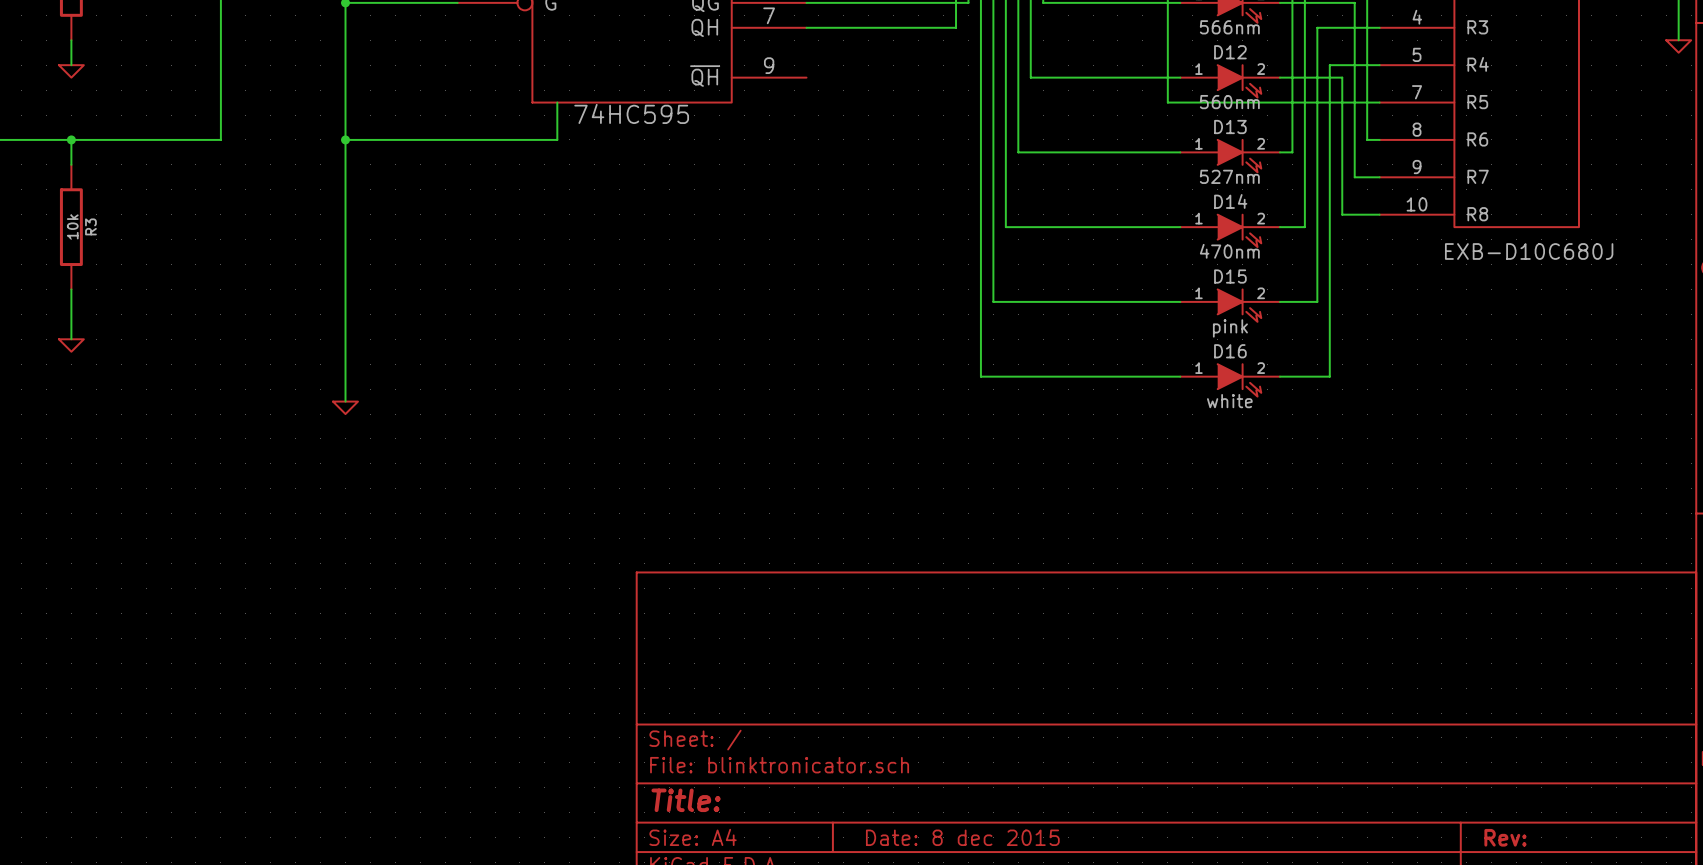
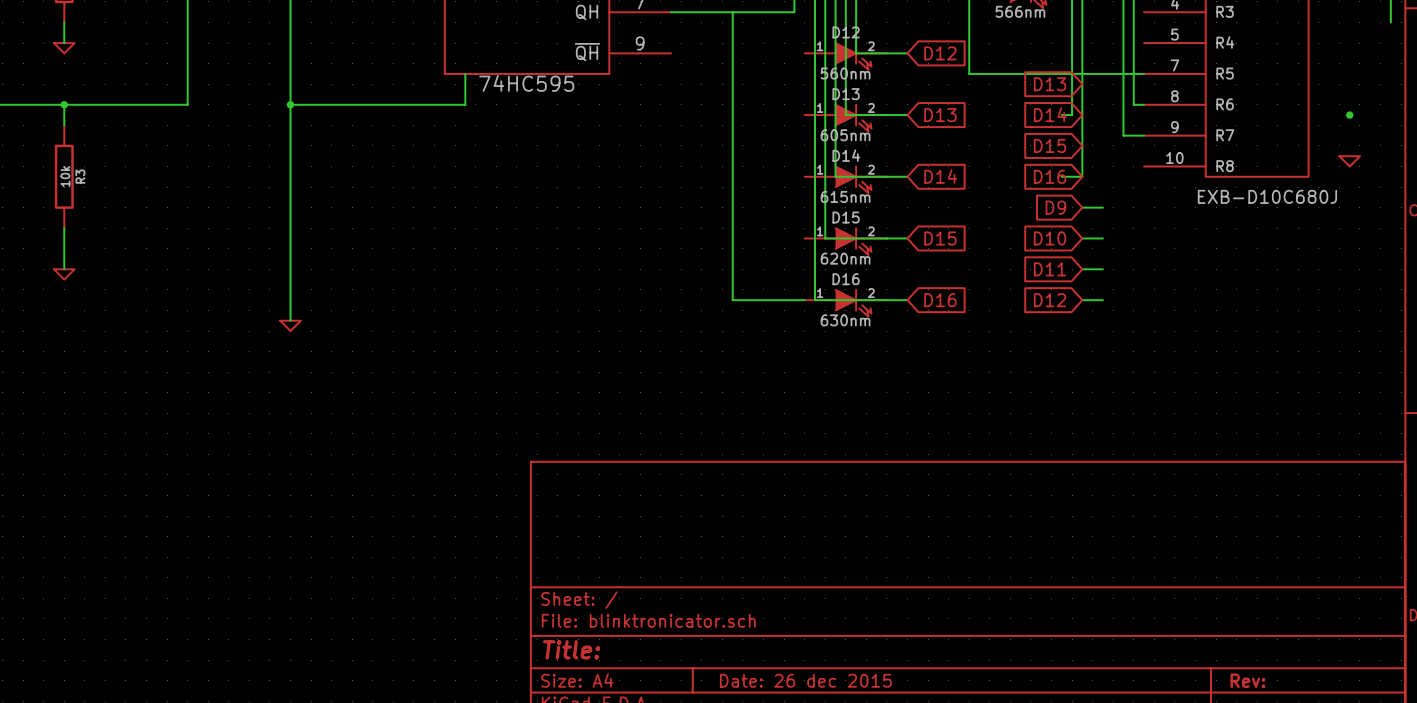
wire: none -> (732, 12) (732, 300) (804, 300)
wire: (1379, 27) (1317, 27) (1317, 301) -> (1102, 238) (1092, 238)
power symbol: (1678, 46) -> none
wire: (1379, 65) (1329, 65) (1329, 376) -> none
wire: (1093, 77) (1180, 77) -> none
global label: none -> D12 (940, 53)
wire: (1279, 77) (1342, 77) (1342, 214) (1379, 214) -> none
D12 position: (1230, 81) -> (845, 56)
global label: none -> D13 (1050, 84)
wire: (1093, 152) (1180, 152) -> none
global label: none -> D13 (940, 115)
global label: none -> D14 (1050, 114)
junction: none -> (1349, 115)
D13 position: (1230, 156) -> (845, 118)
D13 value: 527nm (1229, 176) -> 605nm (845, 135)
global label: none -> D15 (1050, 145)
power symbol: none -> (1349, 161)
global label: none -> D14 (940, 176)
wire: (1093, 227) (1180, 227) -> none
global label: none -> D16 (1050, 176)
D14 position: (1230, 230) -> (845, 179)
D14 value: 470nm (1229, 251) -> 615nm (845, 196)
global label: none -> D9 (1055, 207)
wire: (1093, 301) (1180, 301) -> none
global label: none -> D15 (940, 238)
global label: none -> D10 (1050, 238)
wire: (1279, 301) (1304, 301) -> (1082, 207) (1102, 207)
D15 position: (1230, 305) -> (845, 241)
D15 value: pink (1230, 328) -> 620nm (845, 258)
global label: none -> D11 (1050, 269)
wire: (1093, 376) (1180, 376) -> none
global label: none -> D16 (940, 300)
global label: none -> D12 (1050, 300)
wire: (1279, 376) (1304, 376) -> (1082, 269) (1102, 269)
D16 position: (1230, 380) -> (845, 303)
D16 value: white (1229, 401) -> 630nm (845, 320)
title block: Date: 8 dec 2015 (962, 837) -> Date: 26 dec 2015 (805, 680)

